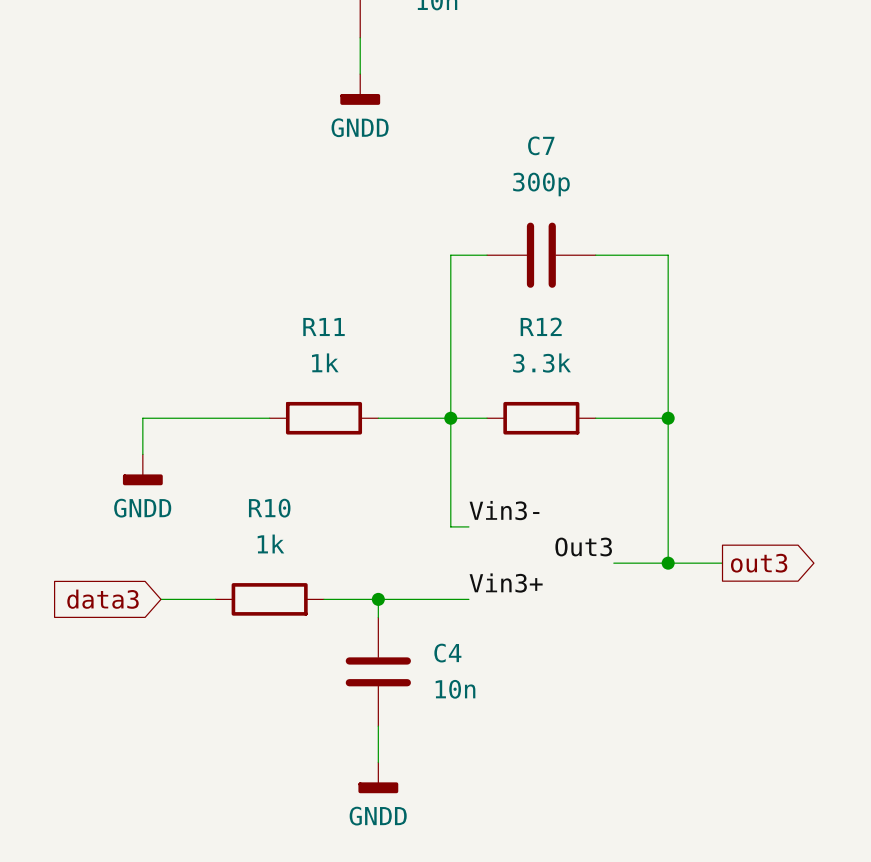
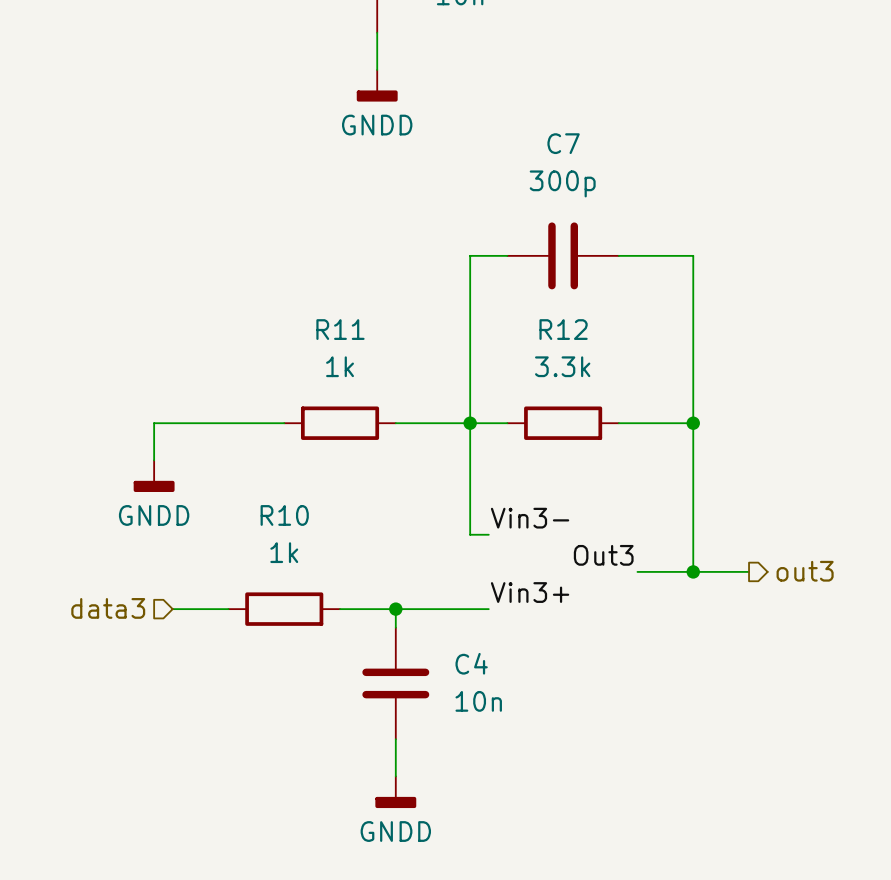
hierarchical label: none -> out3 (805, 571)
global label: out3 (759, 563) -> none
hierarchical label: none -> data3 (108, 608)
global label: data3 (103, 599) -> none

